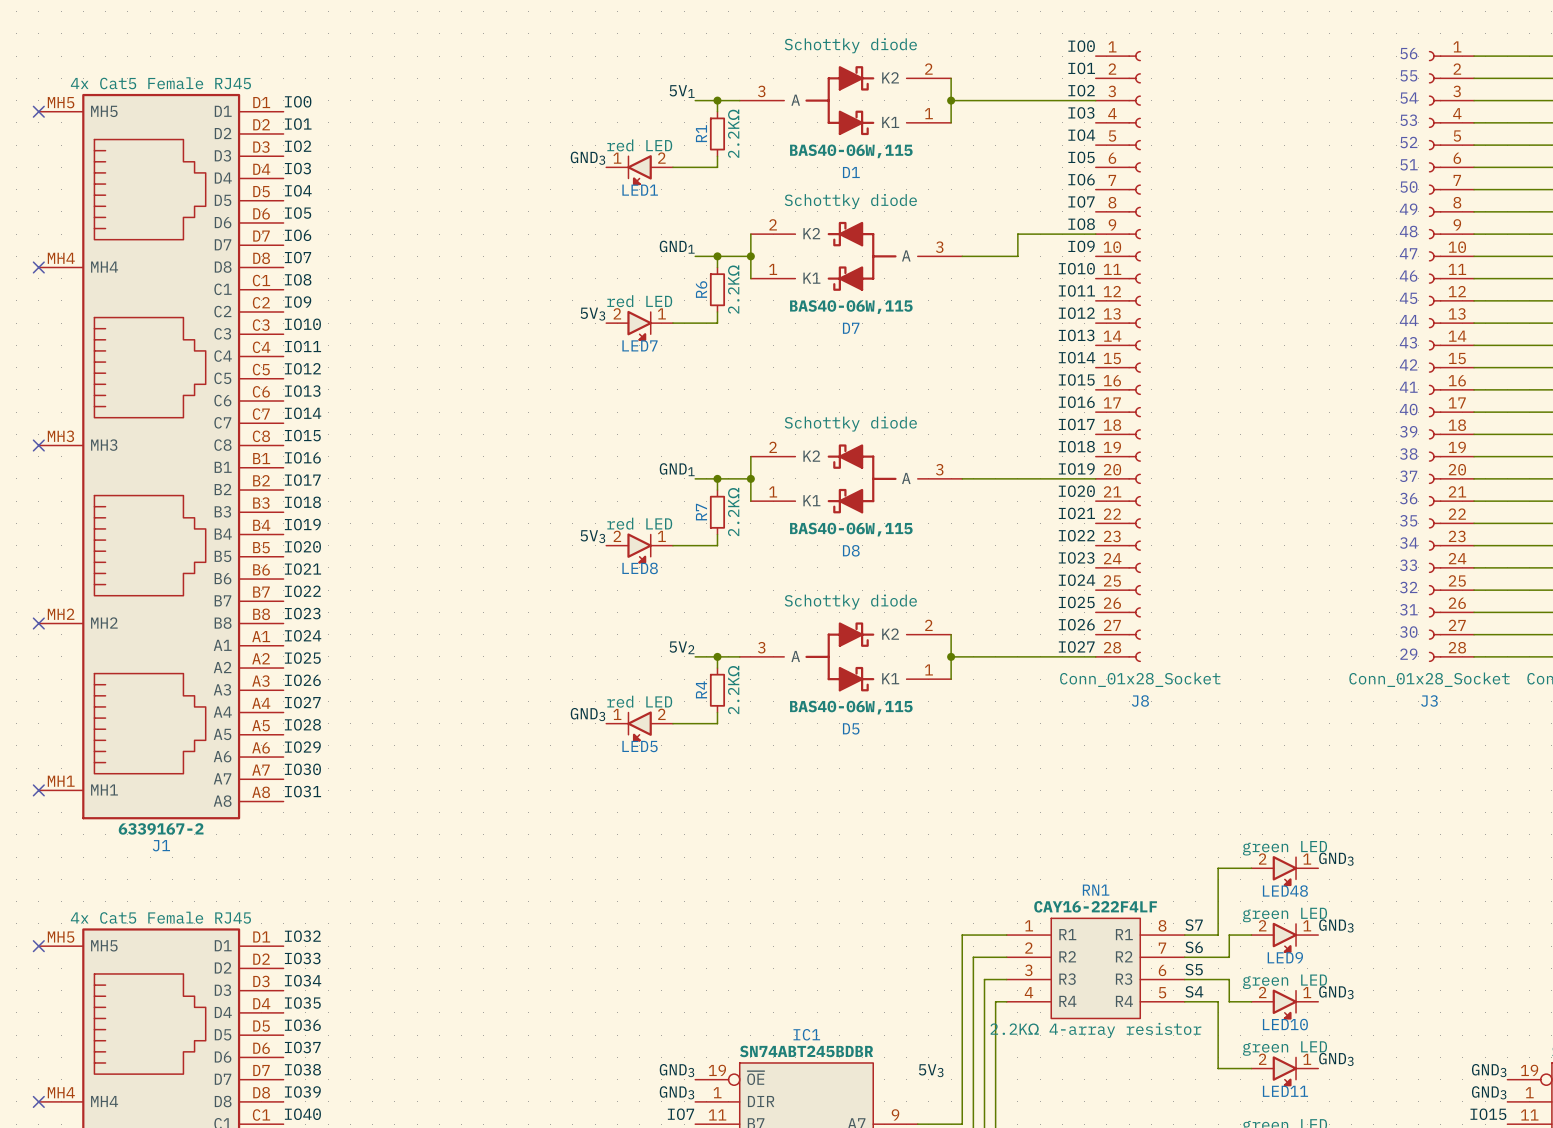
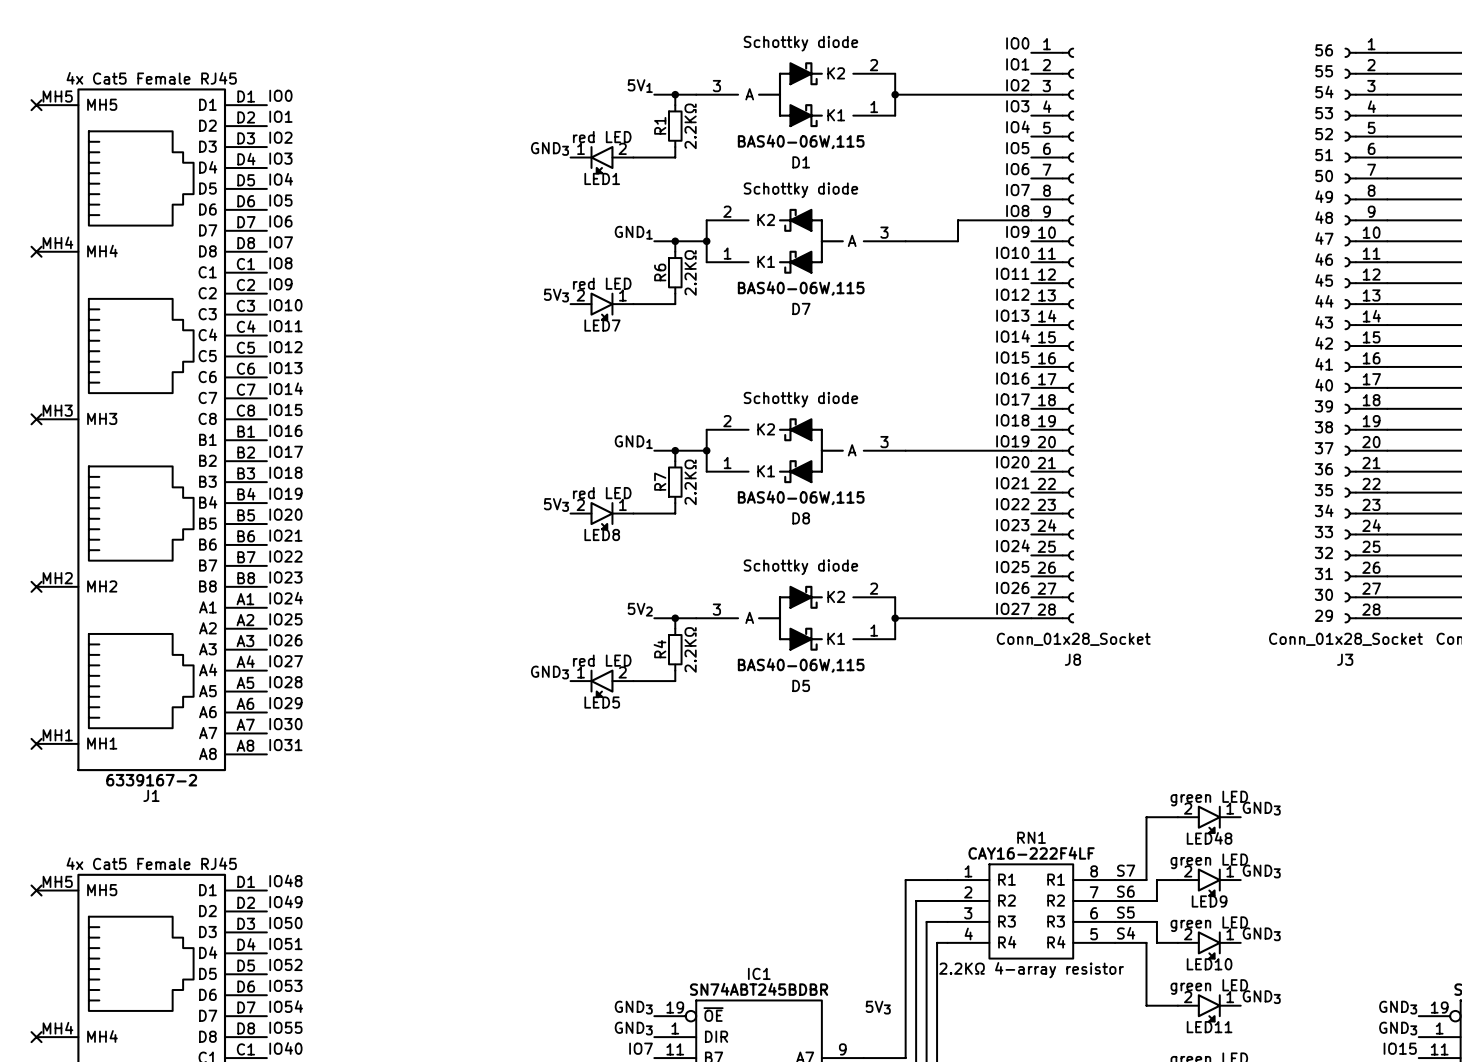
label: IO32 (302, 936) -> IO48 (285, 880)
label: IO33 (302, 958) -> IO49 (285, 901)
label: IO34 (303, 980) -> IO50 (285, 923)
label: IO35 (302, 1002) -> IO51 (285, 944)
label: IO36 (302, 1025) -> IO52 (285, 964)
label: IO37 (302, 1047) -> IO53 (285, 985)
label: IO38 (302, 1069) -> IO54 (286, 1006)
label: IO39 (302, 1091) -> IO55 (285, 1027)

